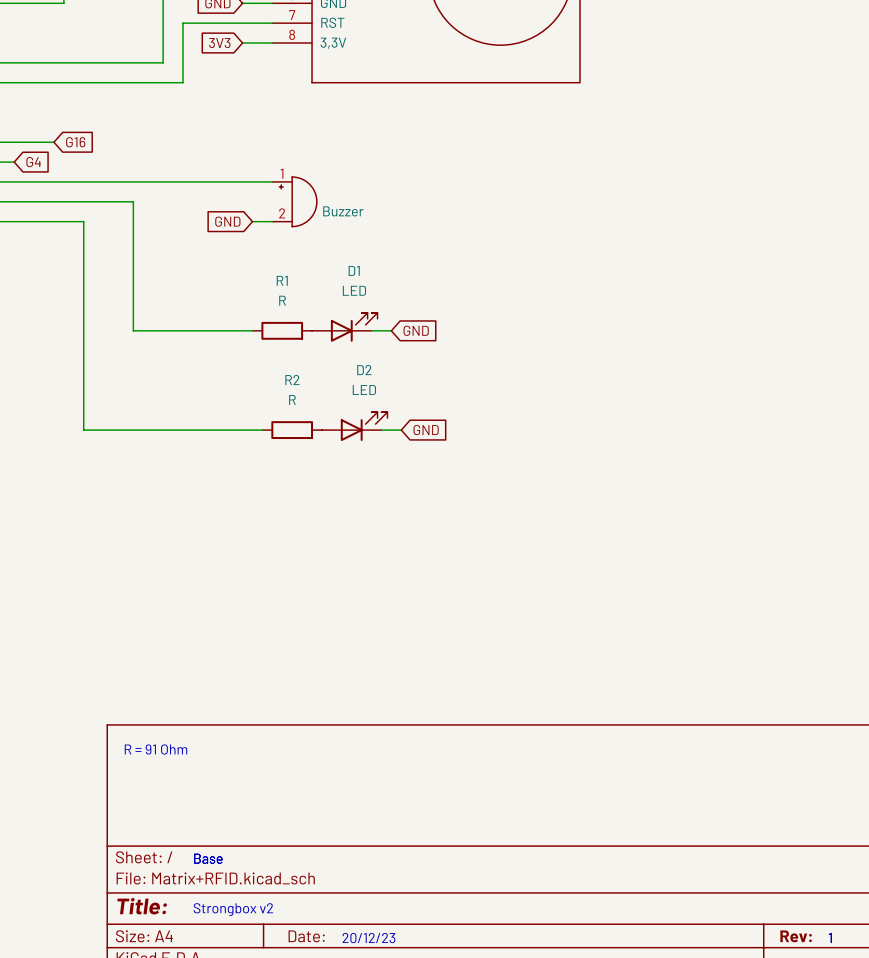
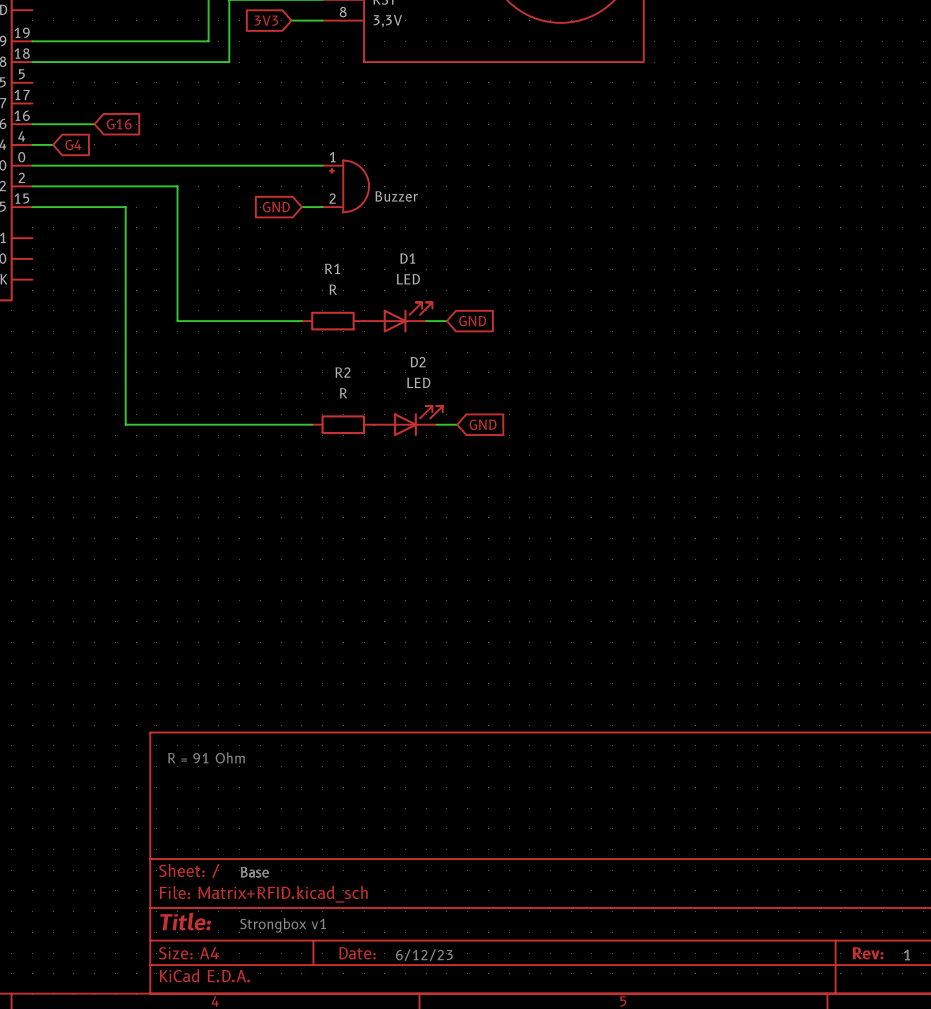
text: Strongbox v2 (233, 909) -> Strongbox v1 (283, 925)
text: 20/12/23 (368, 938) -> 6/12/23 (424, 955)

